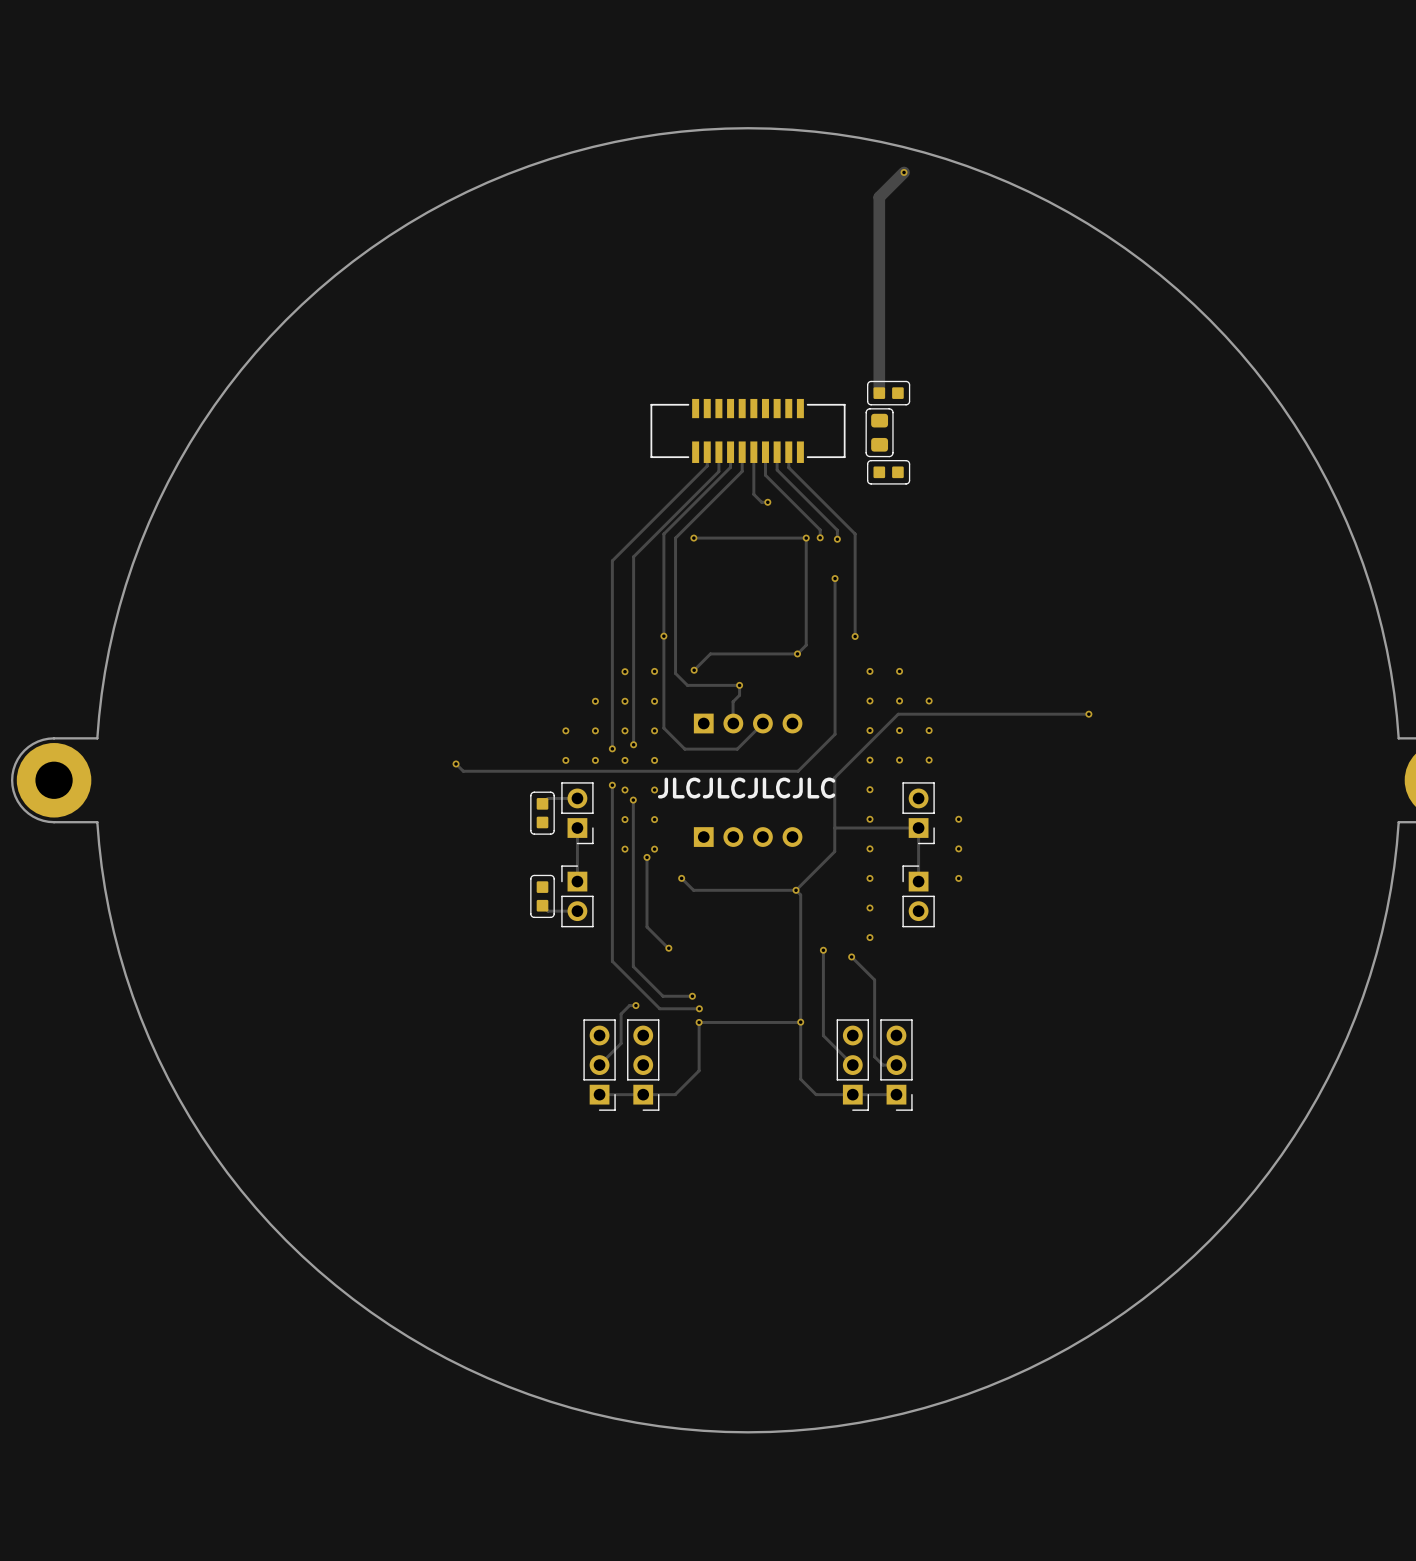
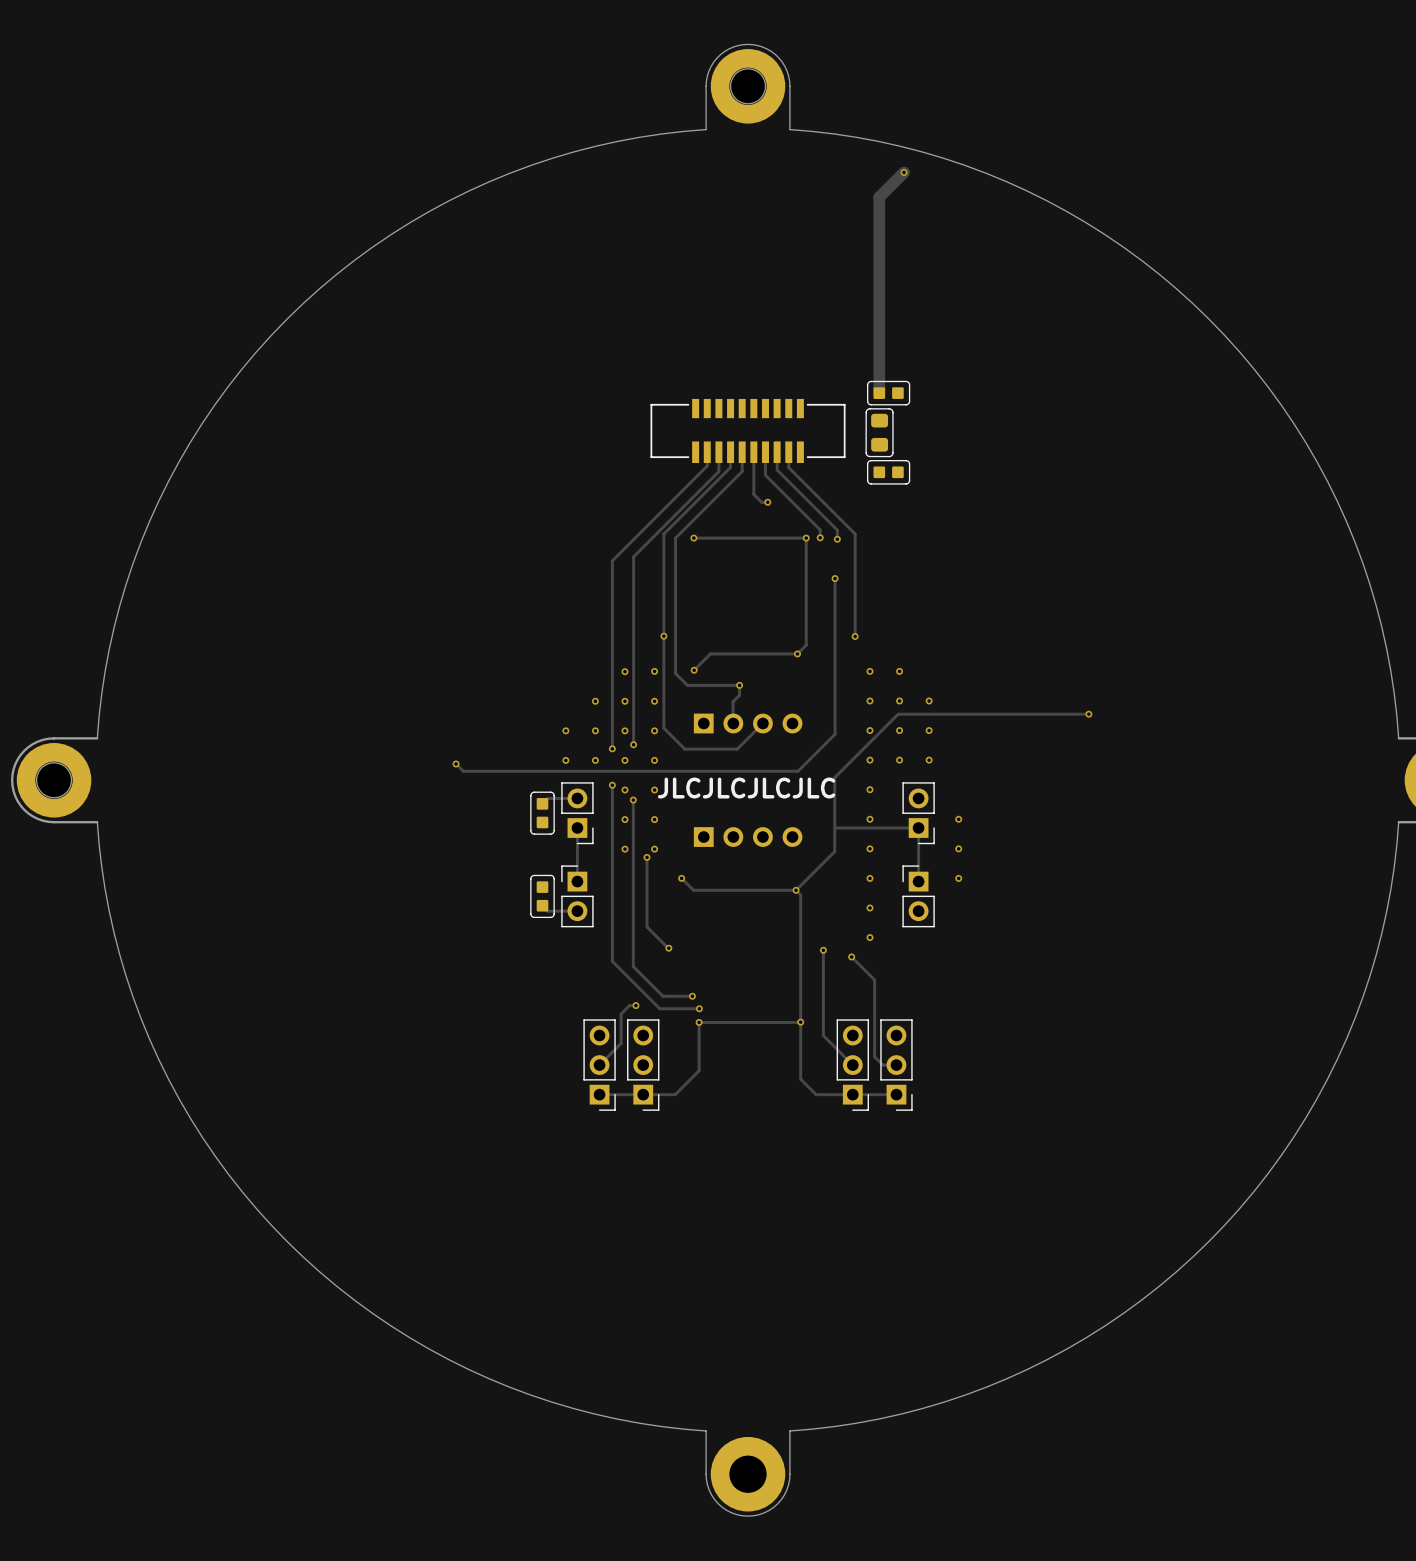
round board edge: none -> [729, 68, 767, 105]
part: none -> (748, 86)
board edge: (97, 738) (105, 671) (119, 606) (140, 542) (158, 501) (189, 442) (227, 387) (255, 352) (302, 304) (353, 261) (389, 235) (447, 201) (508, 173) (571, 152) (636, 137) (681, 131) (748, 128) (814, 131) (859, 137) (924, 152) (987, 173) (1048, 201) (1106, 235) (1142, 261) (1194, 304) (1240, 352) (1281, 405) (1317, 462) (1337, 501) (1363, 563) (1376, 606) (1390, 671) (1398, 738) -> (97, 738) (105, 671) (114, 627) (126, 584) (149, 521) (179, 461) (202, 423) (228, 386) (271, 335) (303, 303) (354, 260) (409, 222) (469, 190) (531, 165) (595, 146) (639, 137) (706, 129) (706, 81) (710, 66) (724, 51) (737, 45) (748, 44) (758, 45) (771, 51) (785, 66) (789, 81) (789, 129) (856, 137) (922, 151) (964, 165) (1026, 190) (1086, 222) (1141, 260) (1176, 288) (1224, 335) (1254, 369) (1293, 423) (1327, 481) (1346, 521) (1370, 584) (1381, 627) (1394, 693) (1398, 738)
round board edge: none -> [36, 762, 73, 799]
board edge: (97, 822) (105, 888) (113, 932) (132, 996) (158, 1058) (189, 1117) (214, 1154) (255, 1207) (302, 1255) (353, 1299) (389, 1324) (447, 1358) (508, 1386) (571, 1408) (636, 1422) (703, 1430) (748, 1432) (814, 1428) (881, 1418) (945, 1401) (987, 1386) (1028, 1368) (1087, 1336) (1142, 1299) (1194, 1255) (1240, 1207) (1281, 1154) (1317, 1098) (1337, 1058) (1363, 996) (1382, 932) (1394, 866) (1398, 822) -> (97, 822) (105, 888) (114, 932) (126, 975) (149, 1038) (179, 1098) (202, 1137) (228, 1173) (271, 1225) (319, 1271) (354, 1300) (409, 1337) (469, 1369) (531, 1395) (595, 1414) (639, 1423) (706, 1430) (706, 1474) (709, 1490) (714, 1499) (727, 1510) (748, 1516) (768, 1510) (781, 1499) (786, 1490) (789, 1474) (789, 1430) (856, 1423) (922, 1408) (985, 1387) (1026, 1369) (1086, 1337) (1123, 1313) (1176, 1271) (1224, 1225) (1267, 1173) (1293, 1137) (1316, 1098) (1346, 1038) (1370, 975) (1381, 932) (1390, 888) (1398, 822)
part: none -> (748, 1474)

